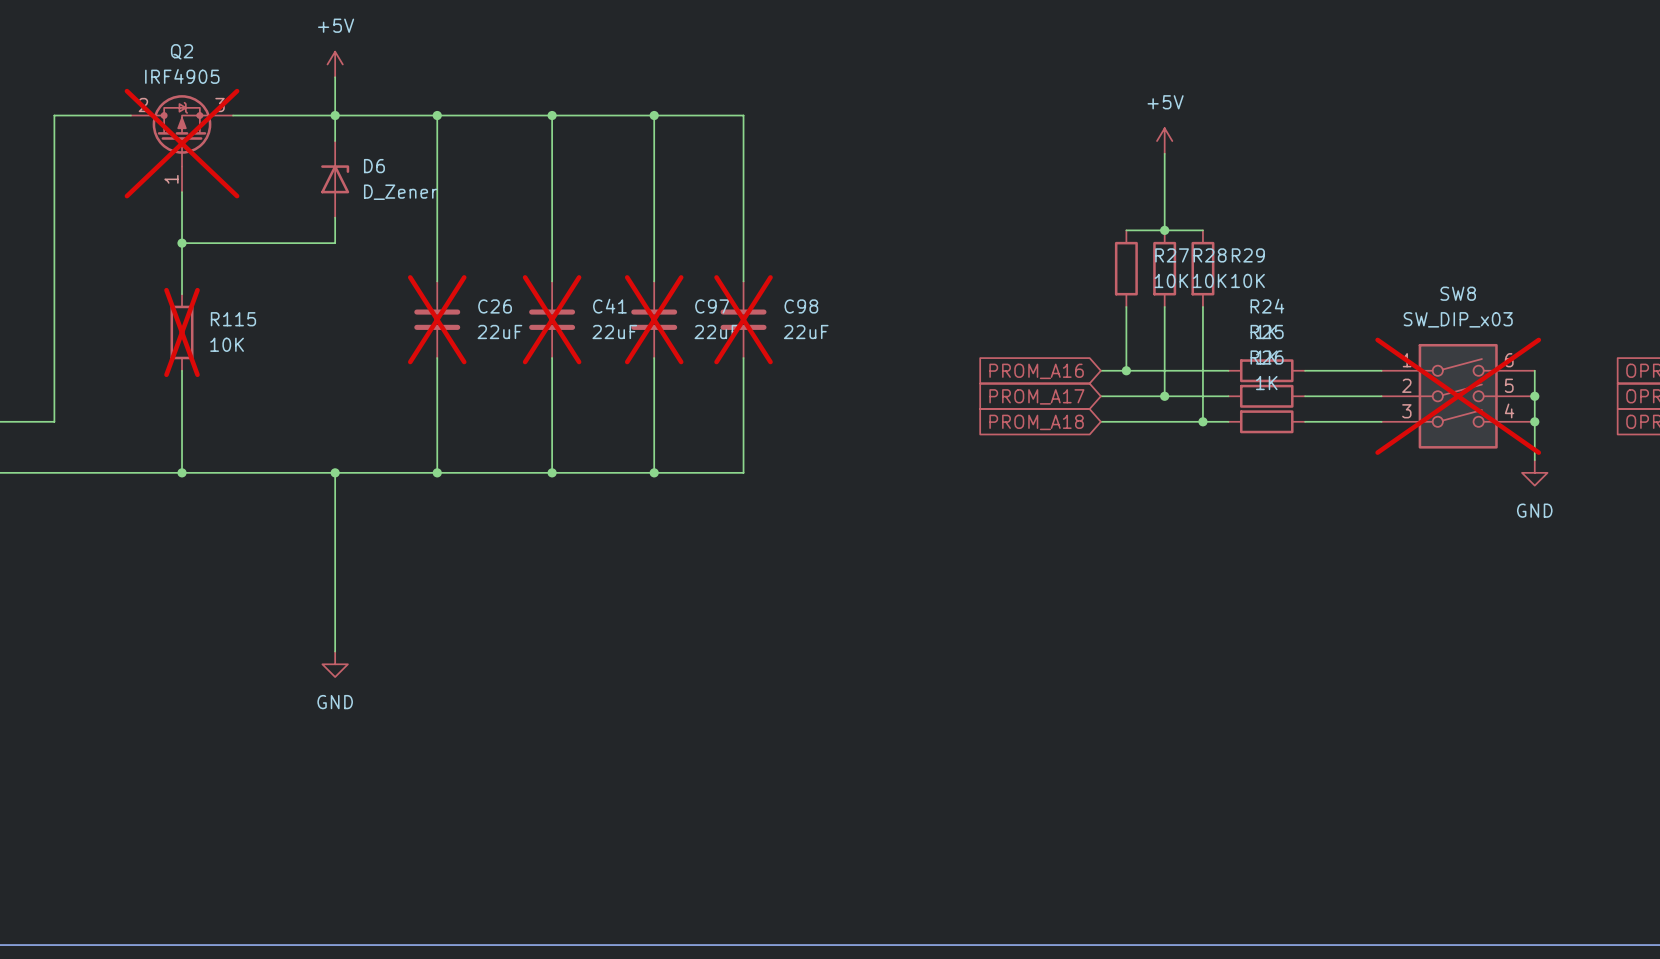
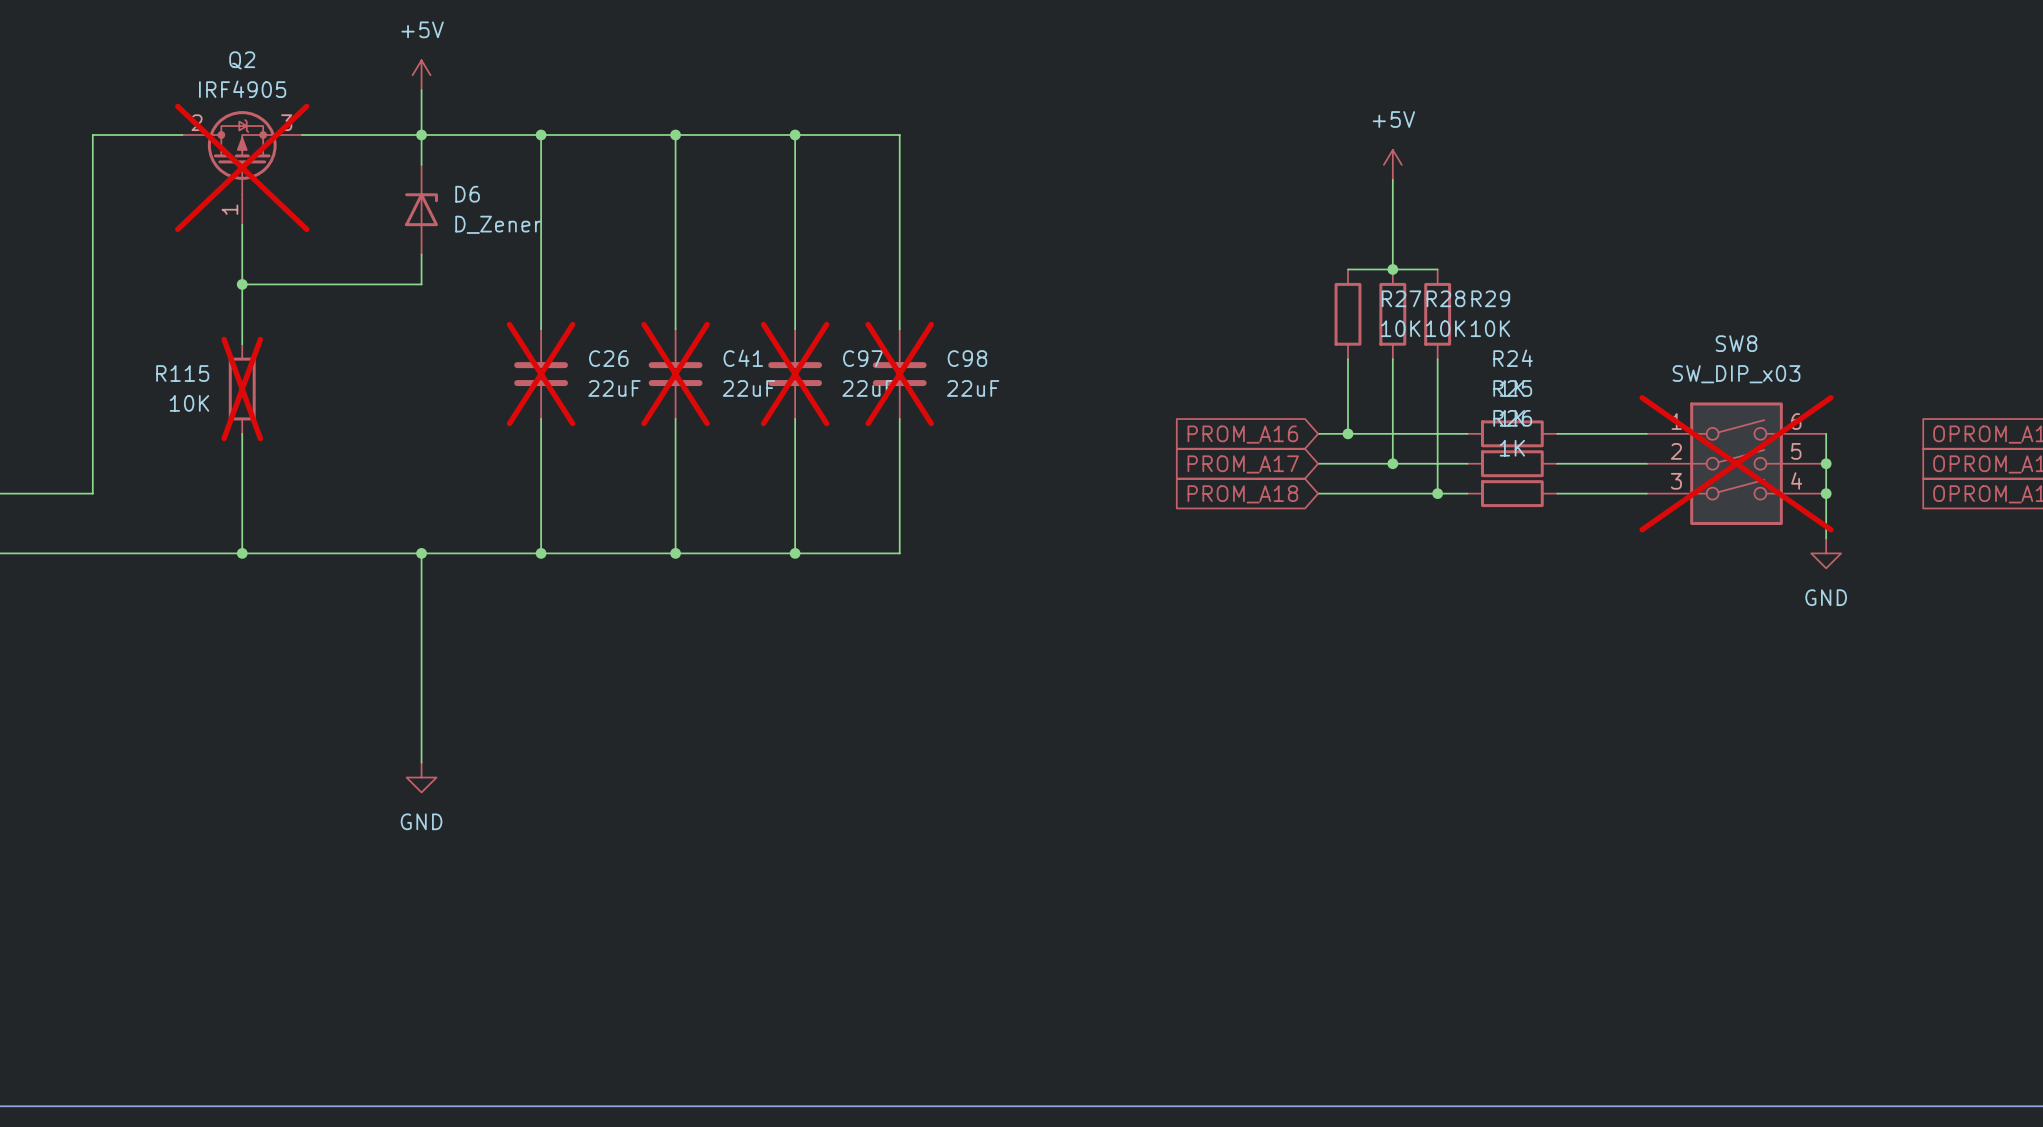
R115 name position: R115 (233, 319) -> R115 (182, 373)
R115 value position: 10K (227, 344) -> 10K (189, 403)

